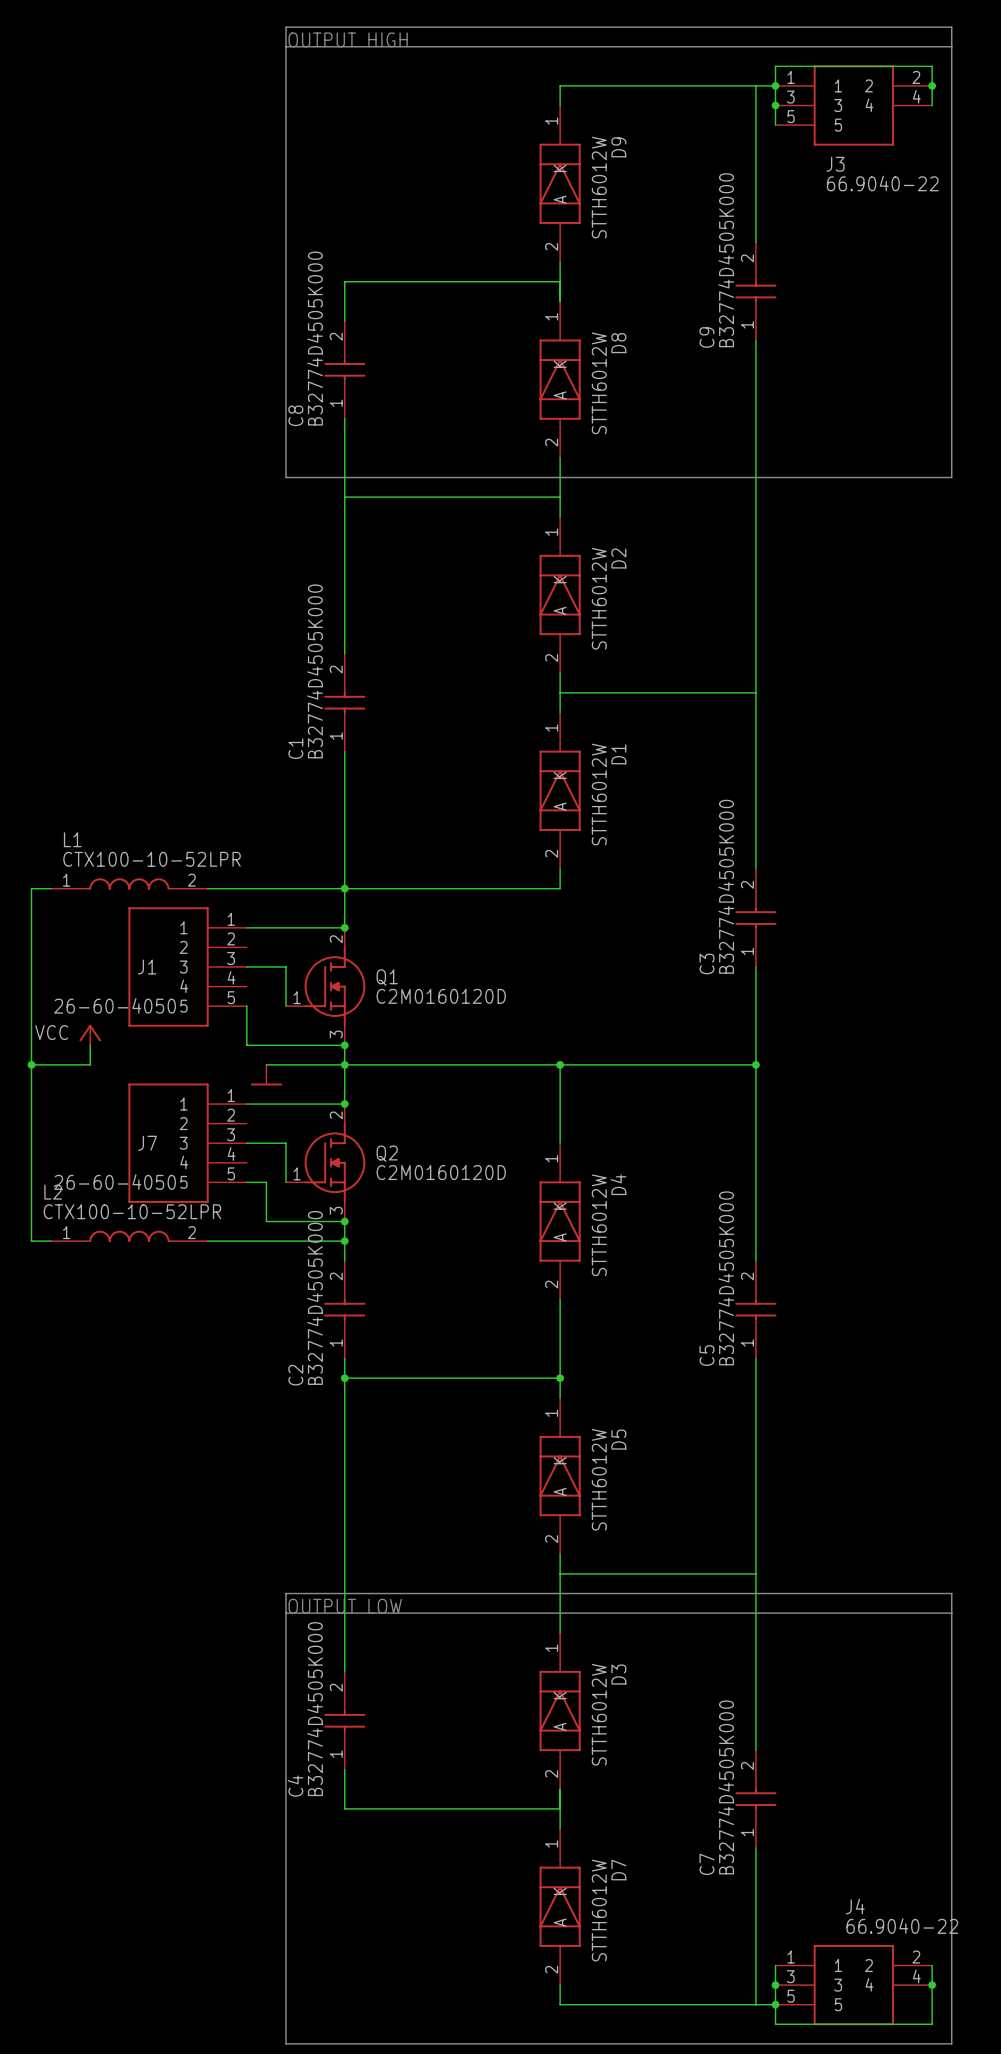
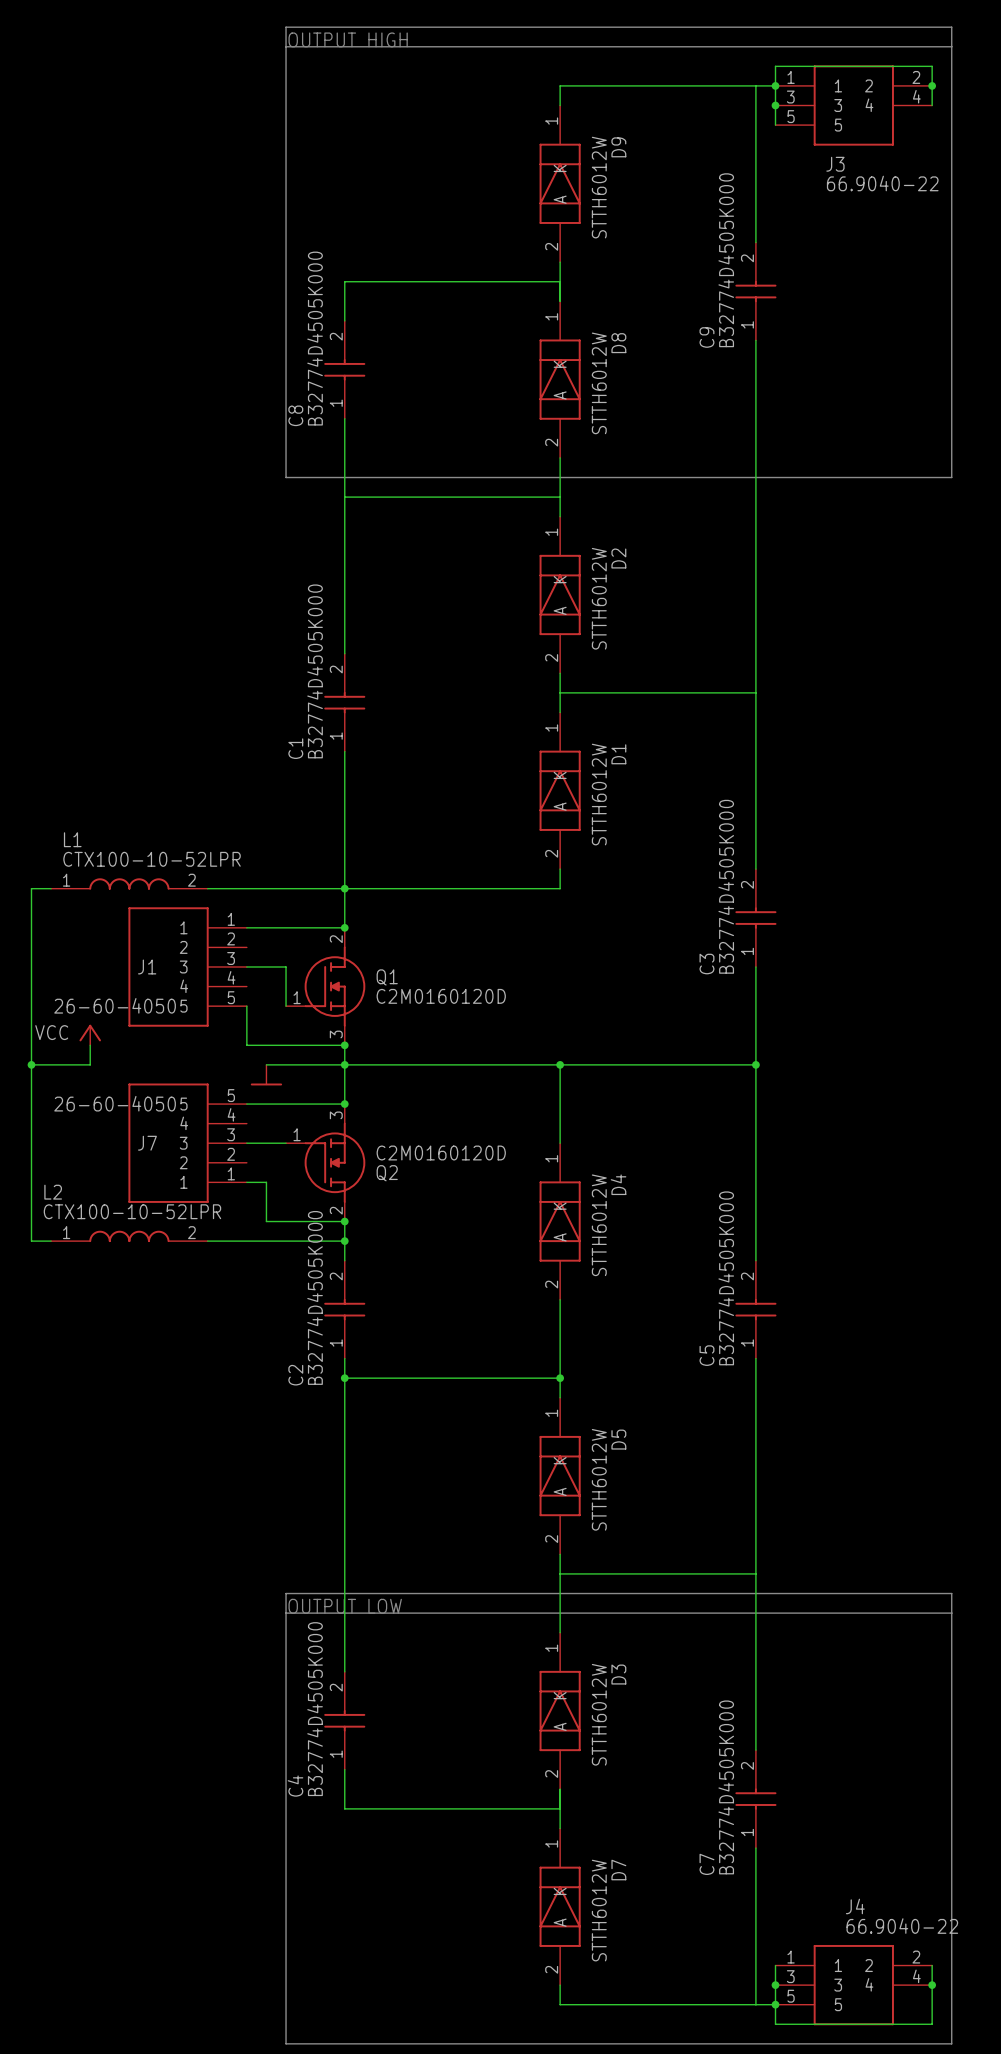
J7 flip: as is (168, 1143) -> up-down (168, 1143)
wire: (286, 1143) (286, 1182) -> none
Q2 flip: as is (334, 1162) -> up-down (334, 1162)

